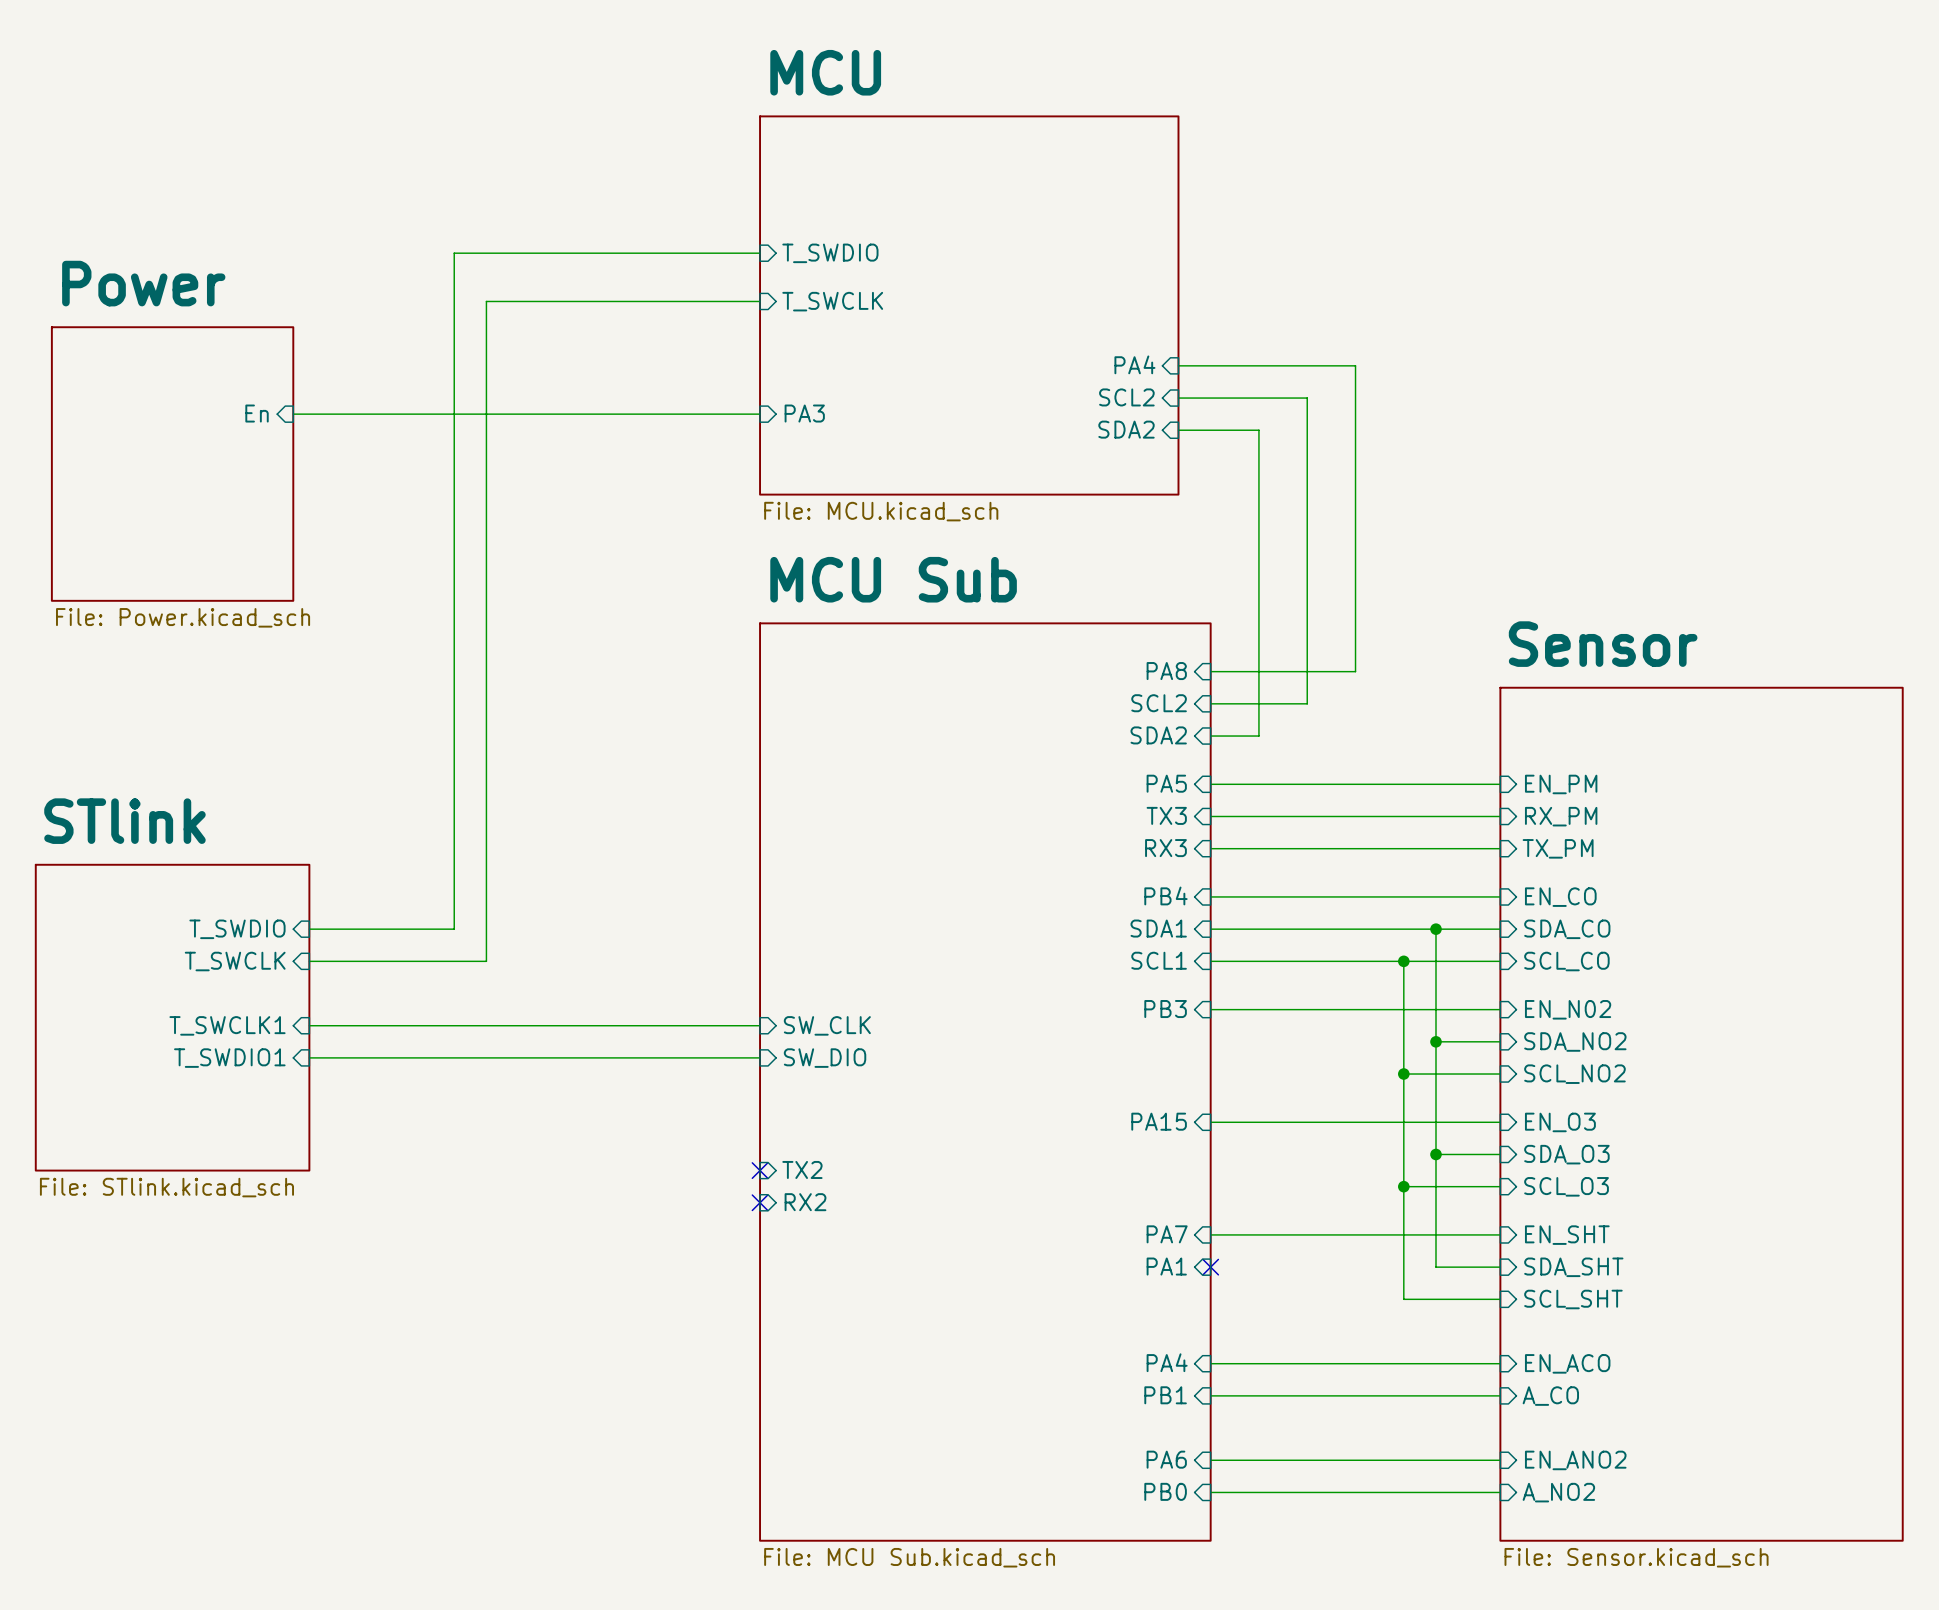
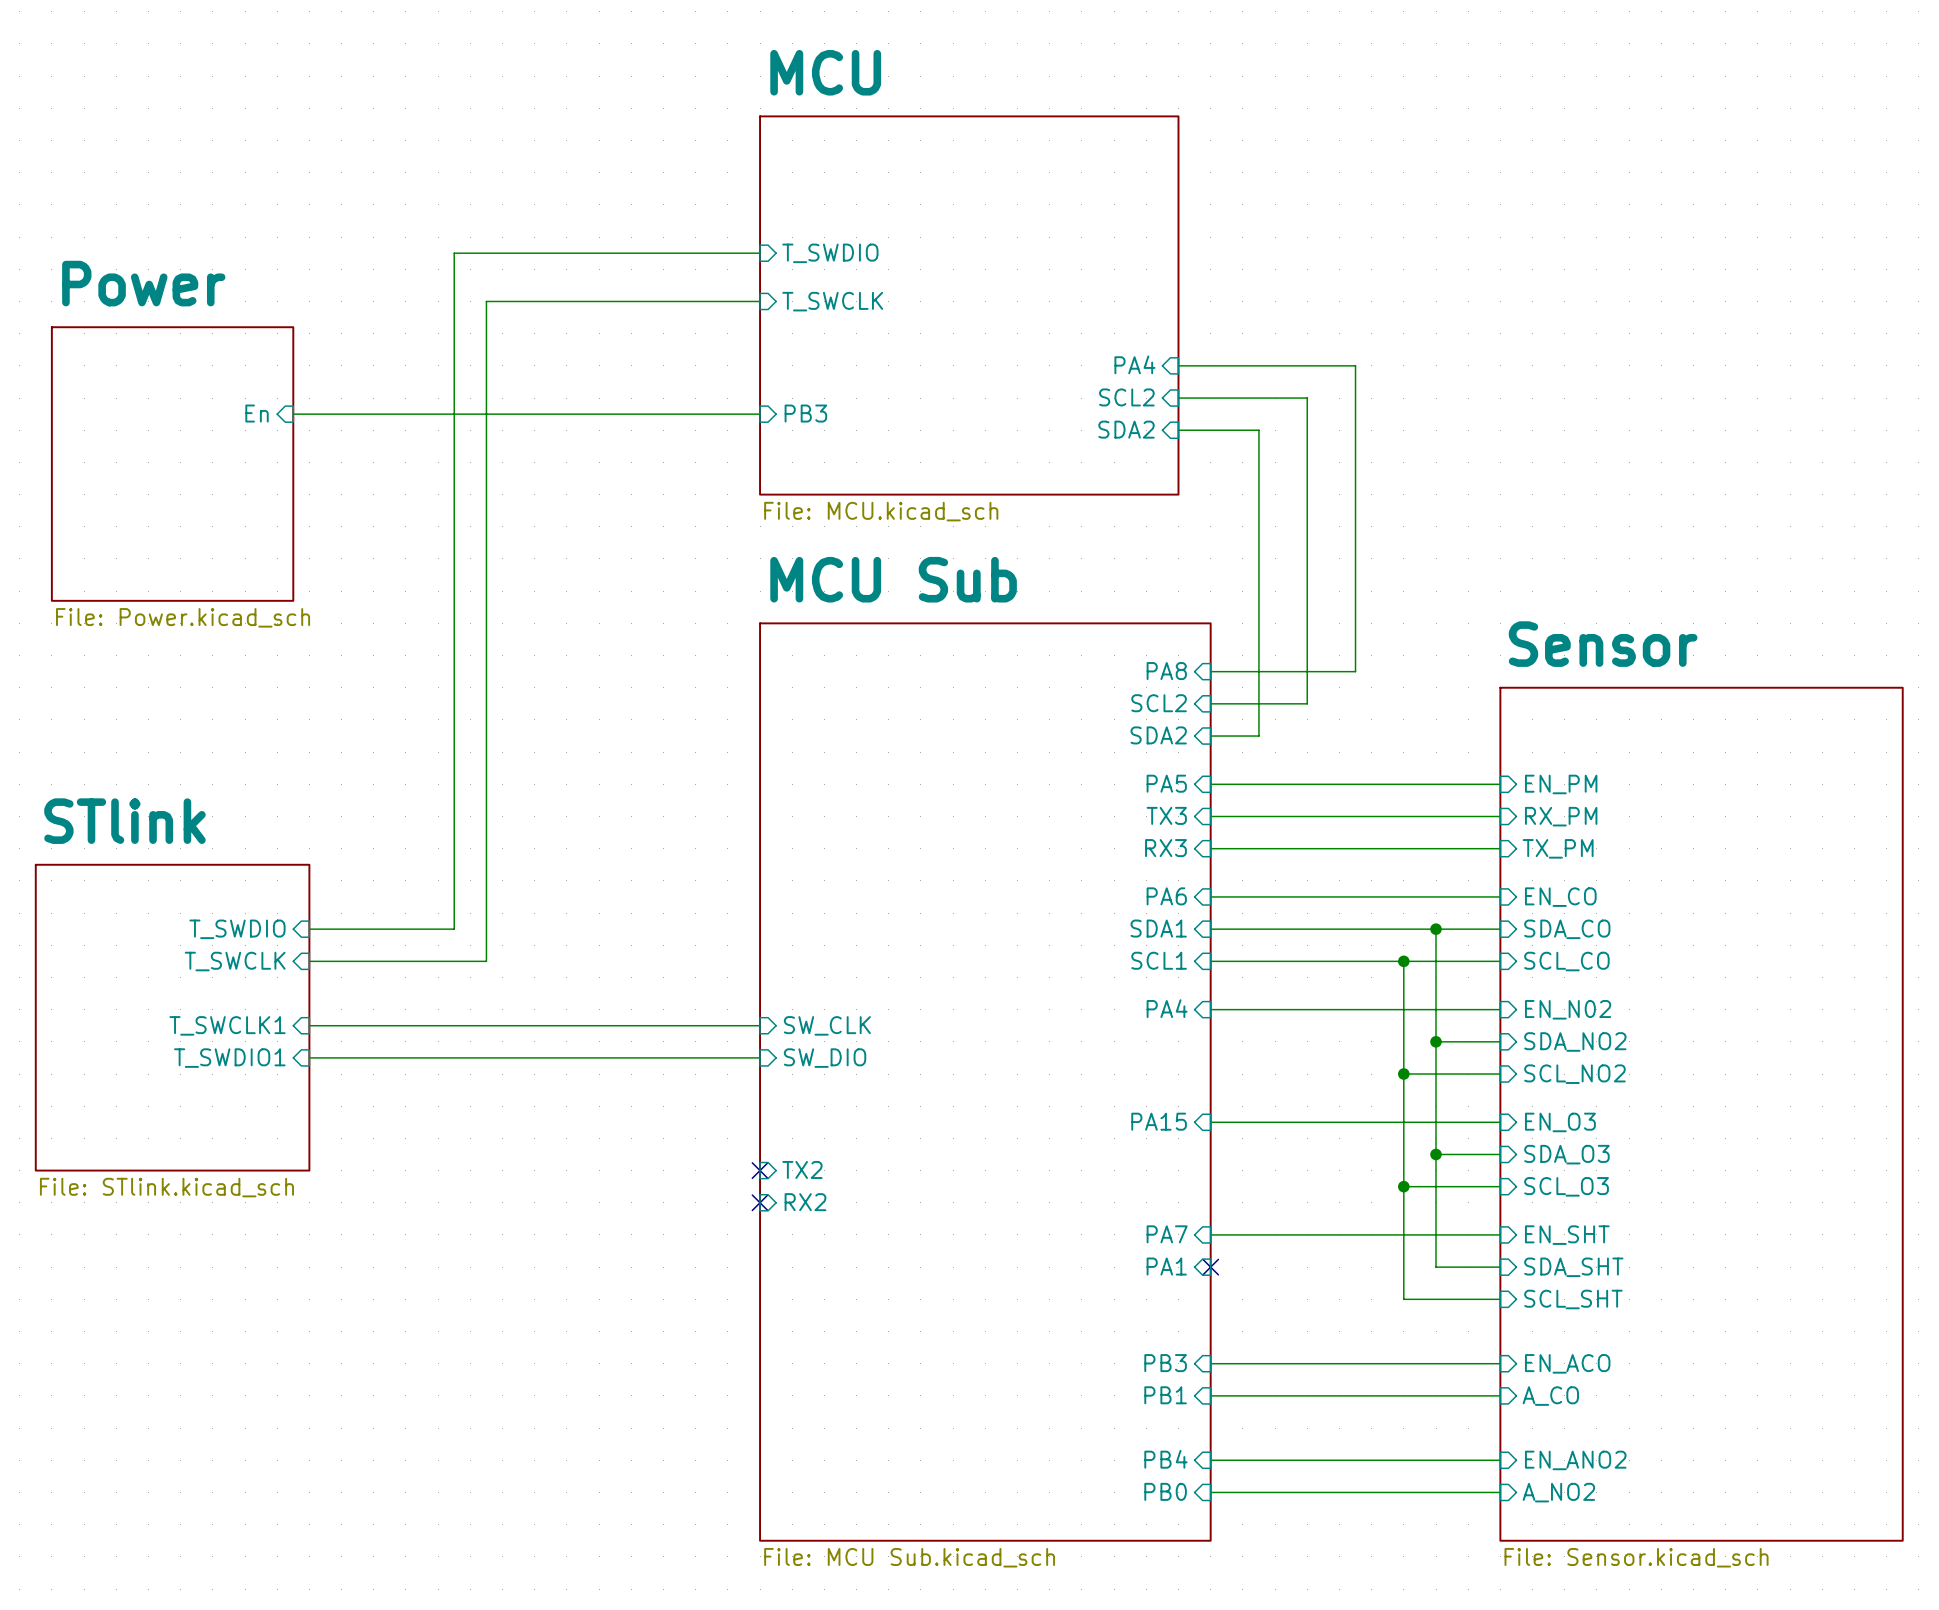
sheet pin: PA3 (804, 413) -> PB3 (805, 413)
sheet pin: PB4 (1165, 895) -> PA6 (1166, 896)
sheet pin: PB3 (1165, 1009) -> PA4 (1167, 1008)
sheet pin: PA4 (1167, 1362) -> PB3 (1165, 1363)
sheet pin: PA6 (1166, 1459) -> PB4 (1165, 1459)

